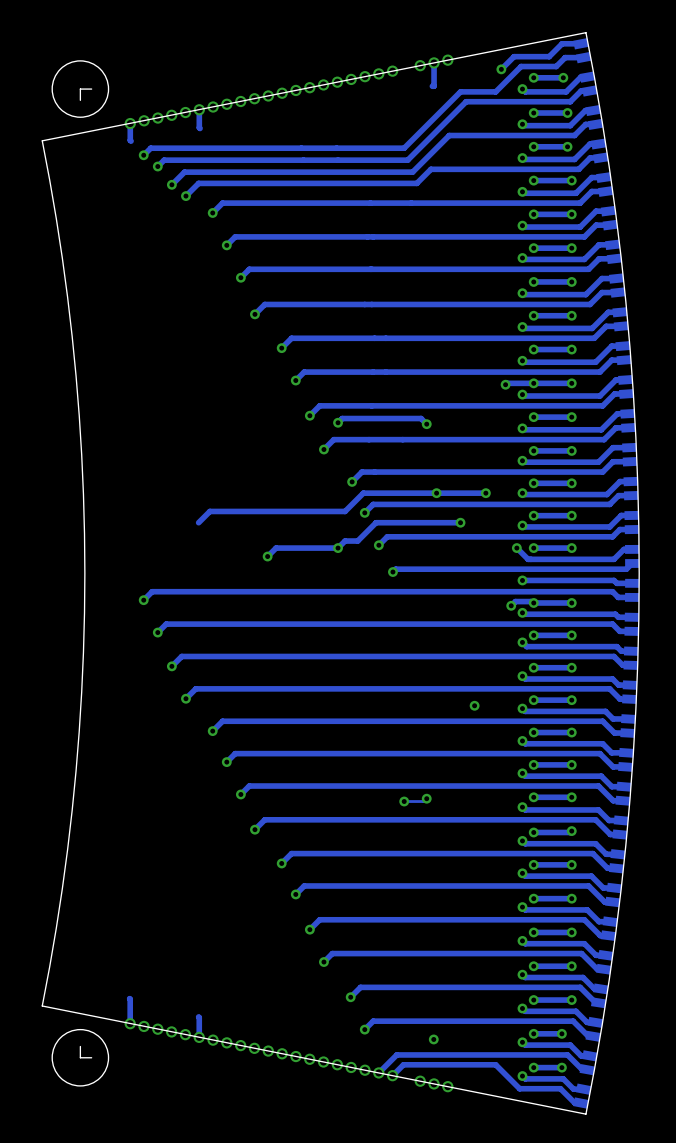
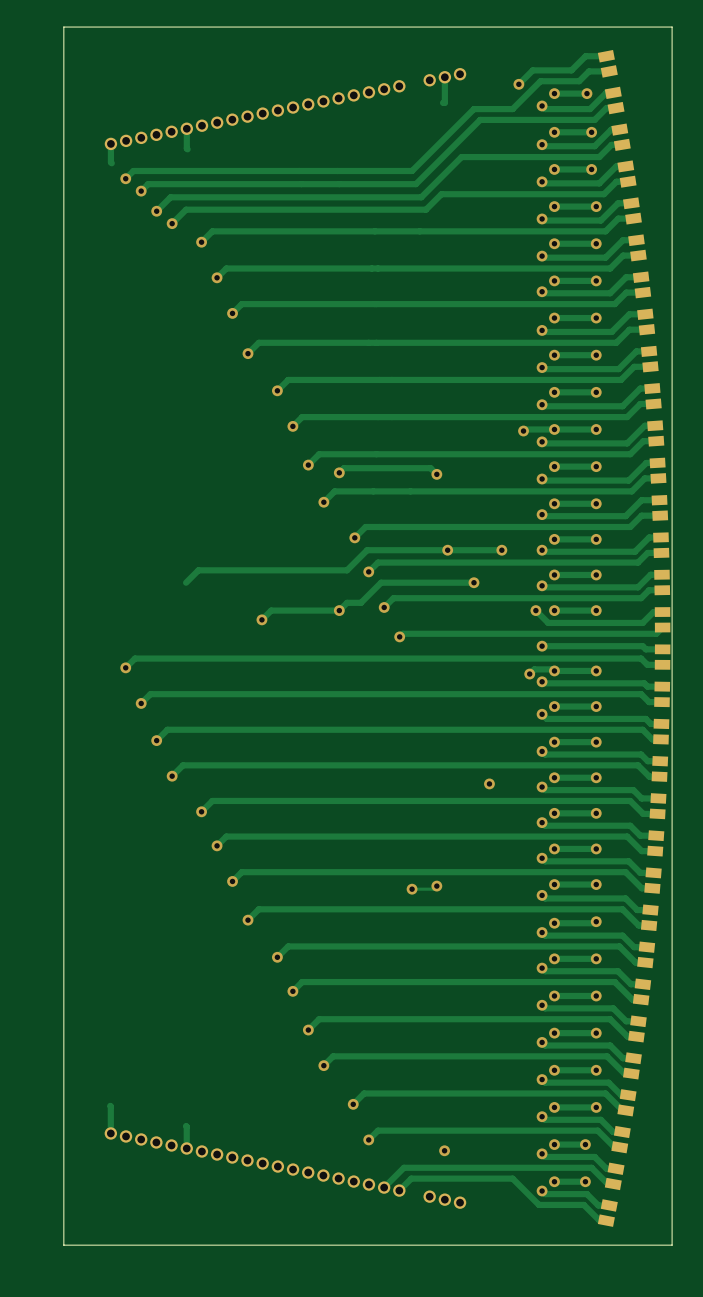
board edge: (585, 32) (42, 140) (62, 257) (72, 336) (81, 454) (84, 573) (81, 692) (72, 810) (62, 888) (42, 1005) (585, 1114) (609, 980) (625, 845) (635, 709) (639, 573) (635, 437) (625, 301) (609, 166) (585, 32) -> (672, 27) (672, 1245) (63, 1245) (63, 27) (672, 27)
round board edge: [51, 60, 110, 118] -> none
board edge: (91, 89) (80, 89) (80, 100) -> none
round board edge: [51, 1029, 110, 1087] -> none
board edge: (80, 1046) (80, 1057) (91, 1057) -> none

